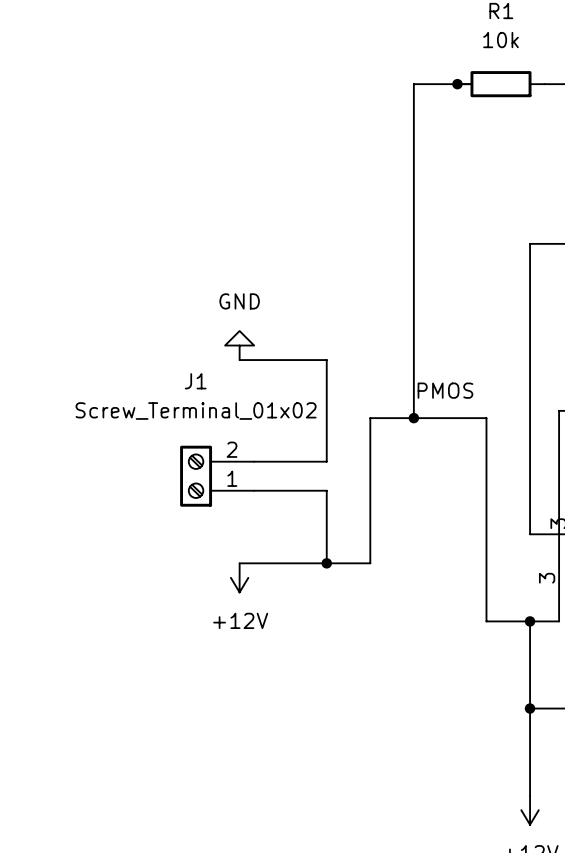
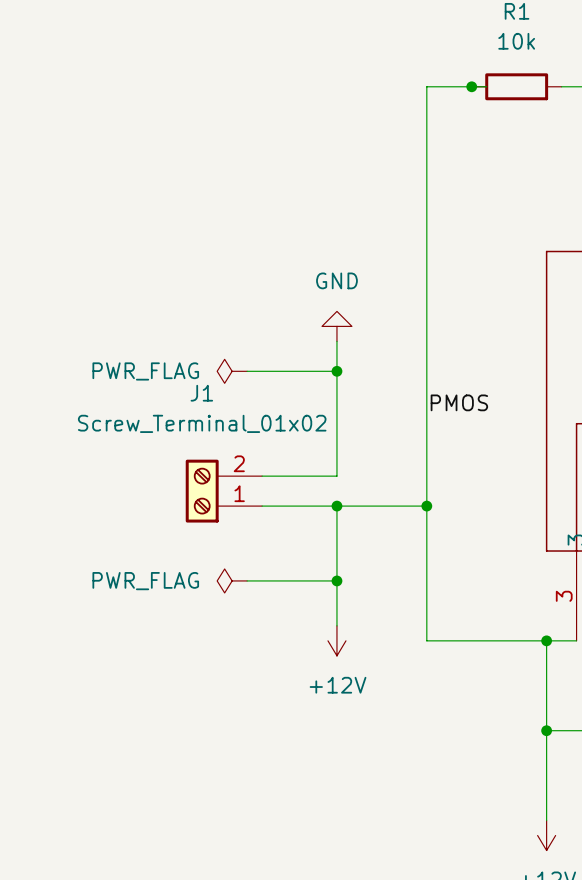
wire: none -> (336, 341) (336, 371)
power symbol position: GND (239, 345) -> GND (336, 326)
power symbol: none -> PWR_FLAG (232, 371)
junction: none -> (336, 371)
wire: none -> (426, 431) (426, 640) (501, 640)
junction: (413, 418) -> none
wire: none -> (336, 506) (426, 506)
junction: none -> (336, 506)
junction: none -> (426, 506)
power symbol: none -> PWR_FLAG (232, 580)
wire: (326, 563) (370, 563) (370, 418) (486, 418) (486, 621) -> (336, 580) (336, 625)
power symbol position: +12V (239, 577) -> +12V (336, 640)

